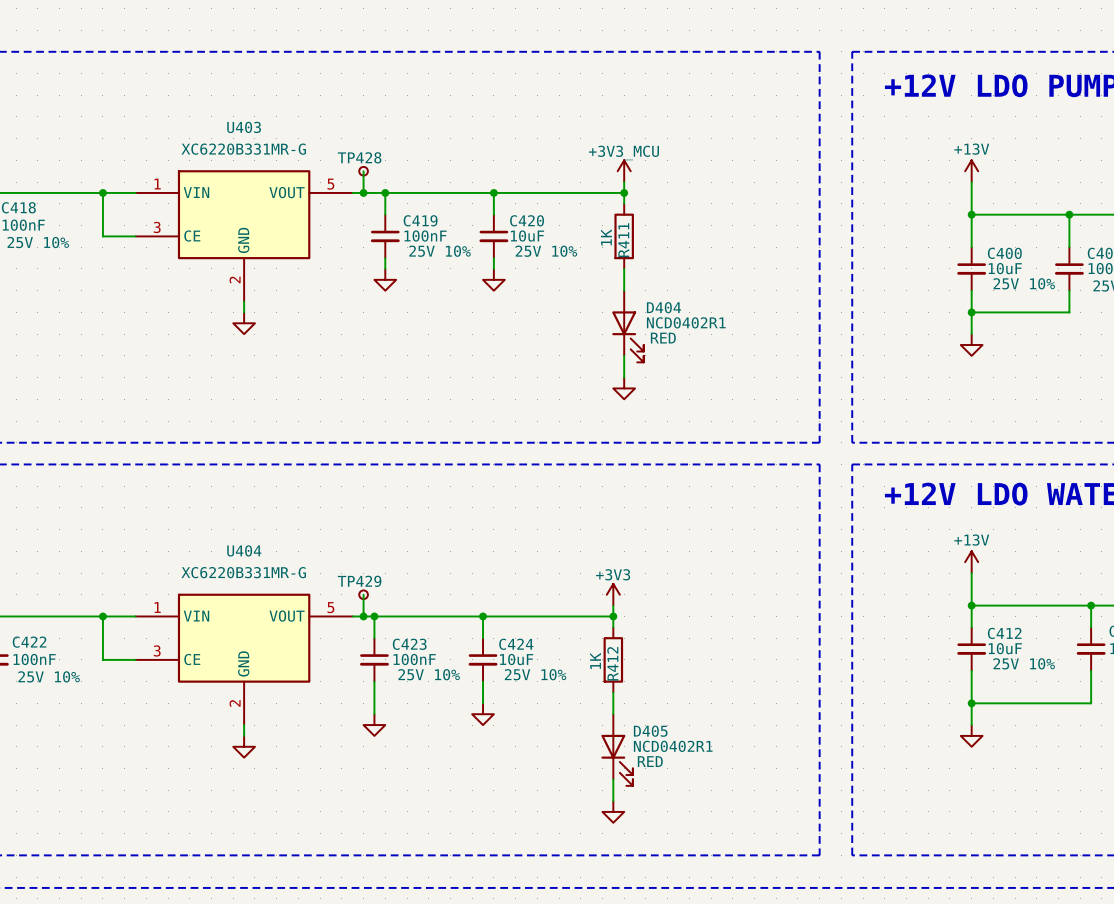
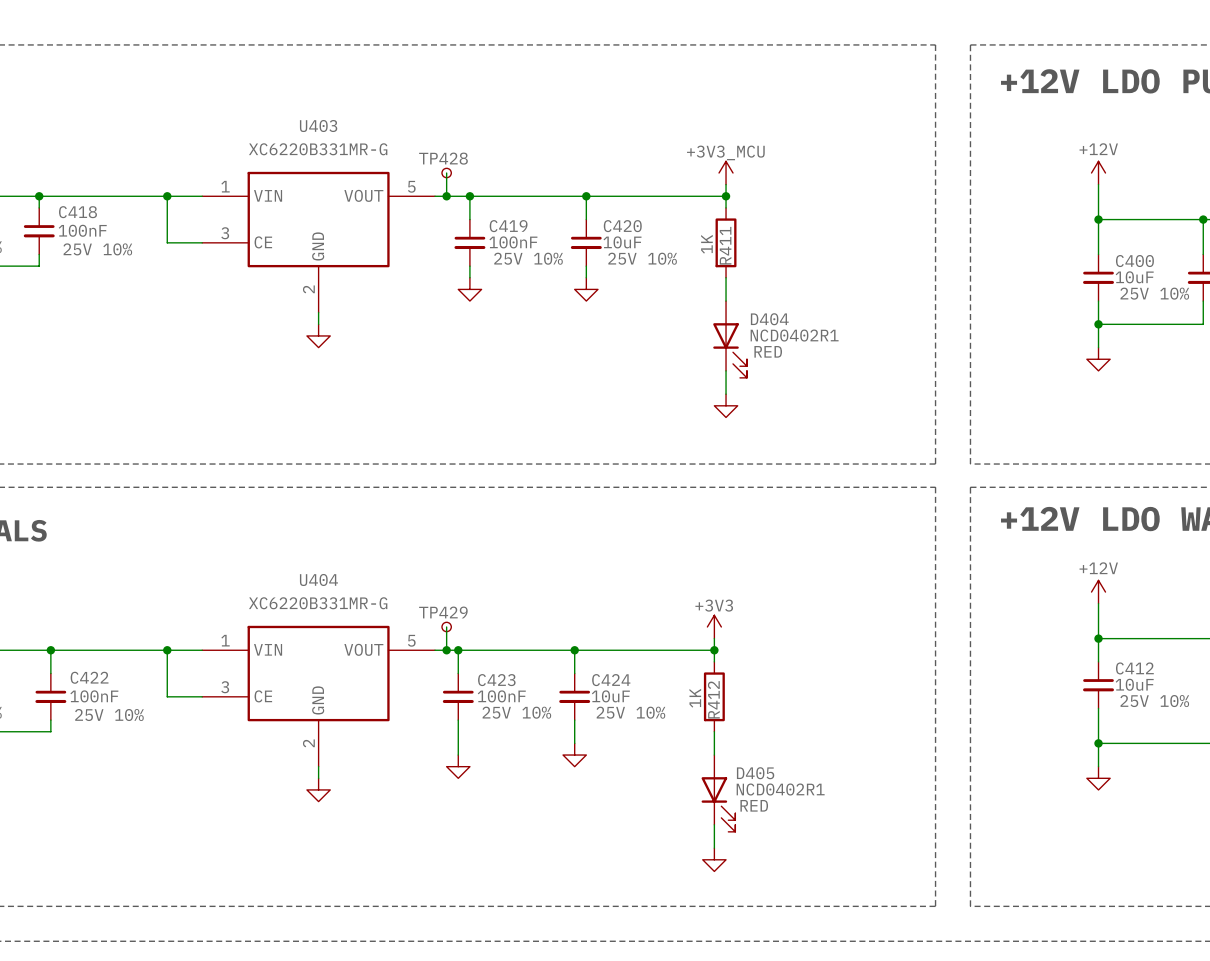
power symbol: +13V (971, 171) -> +12V (1098, 173)
power symbol: +13V (971, 562) -> +12V (1098, 592)

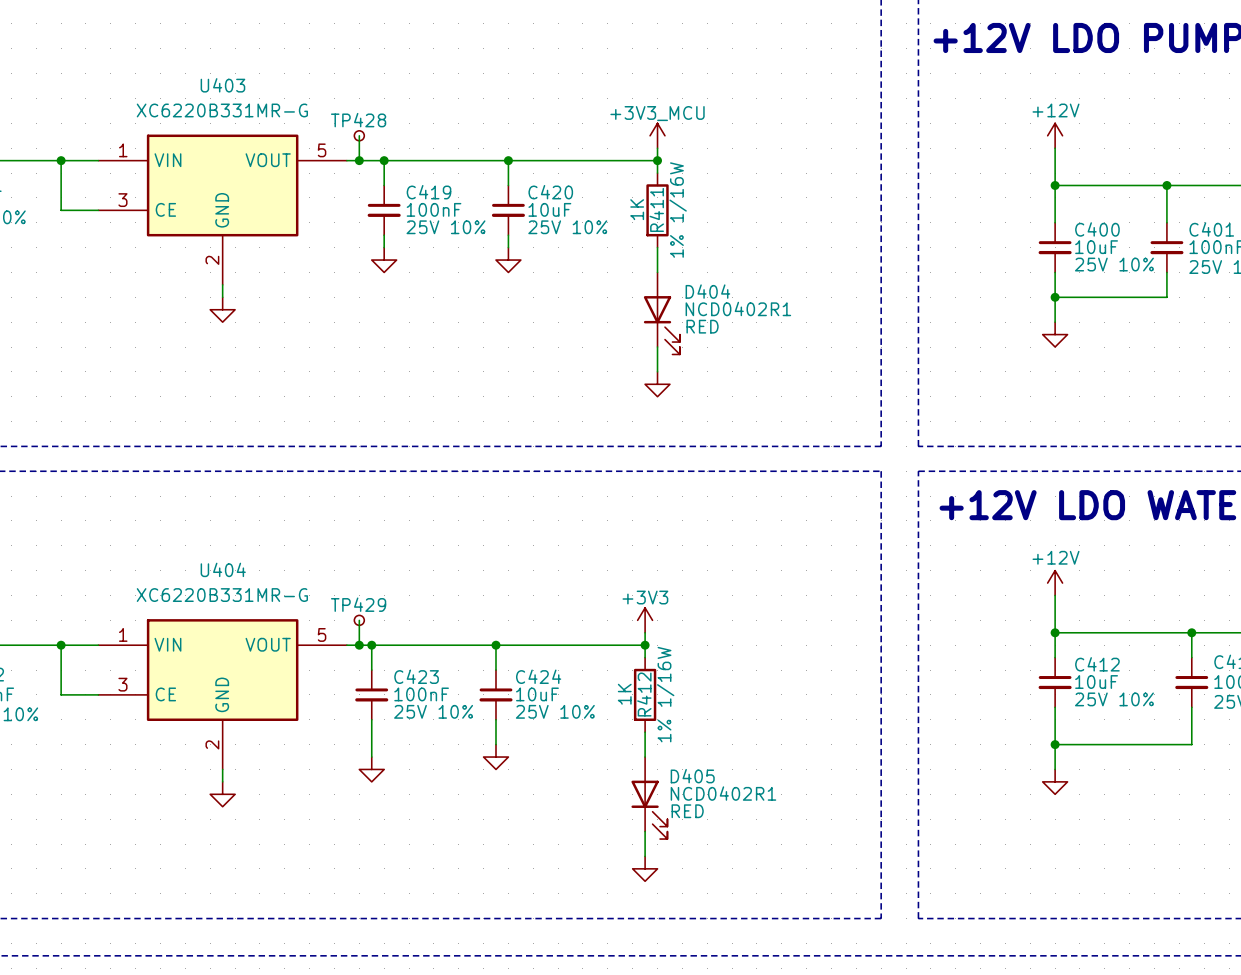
R411 text: none -> 1% 1/16W (678, 210)
R412 text: none -> 1% 1/16W (665, 694)

